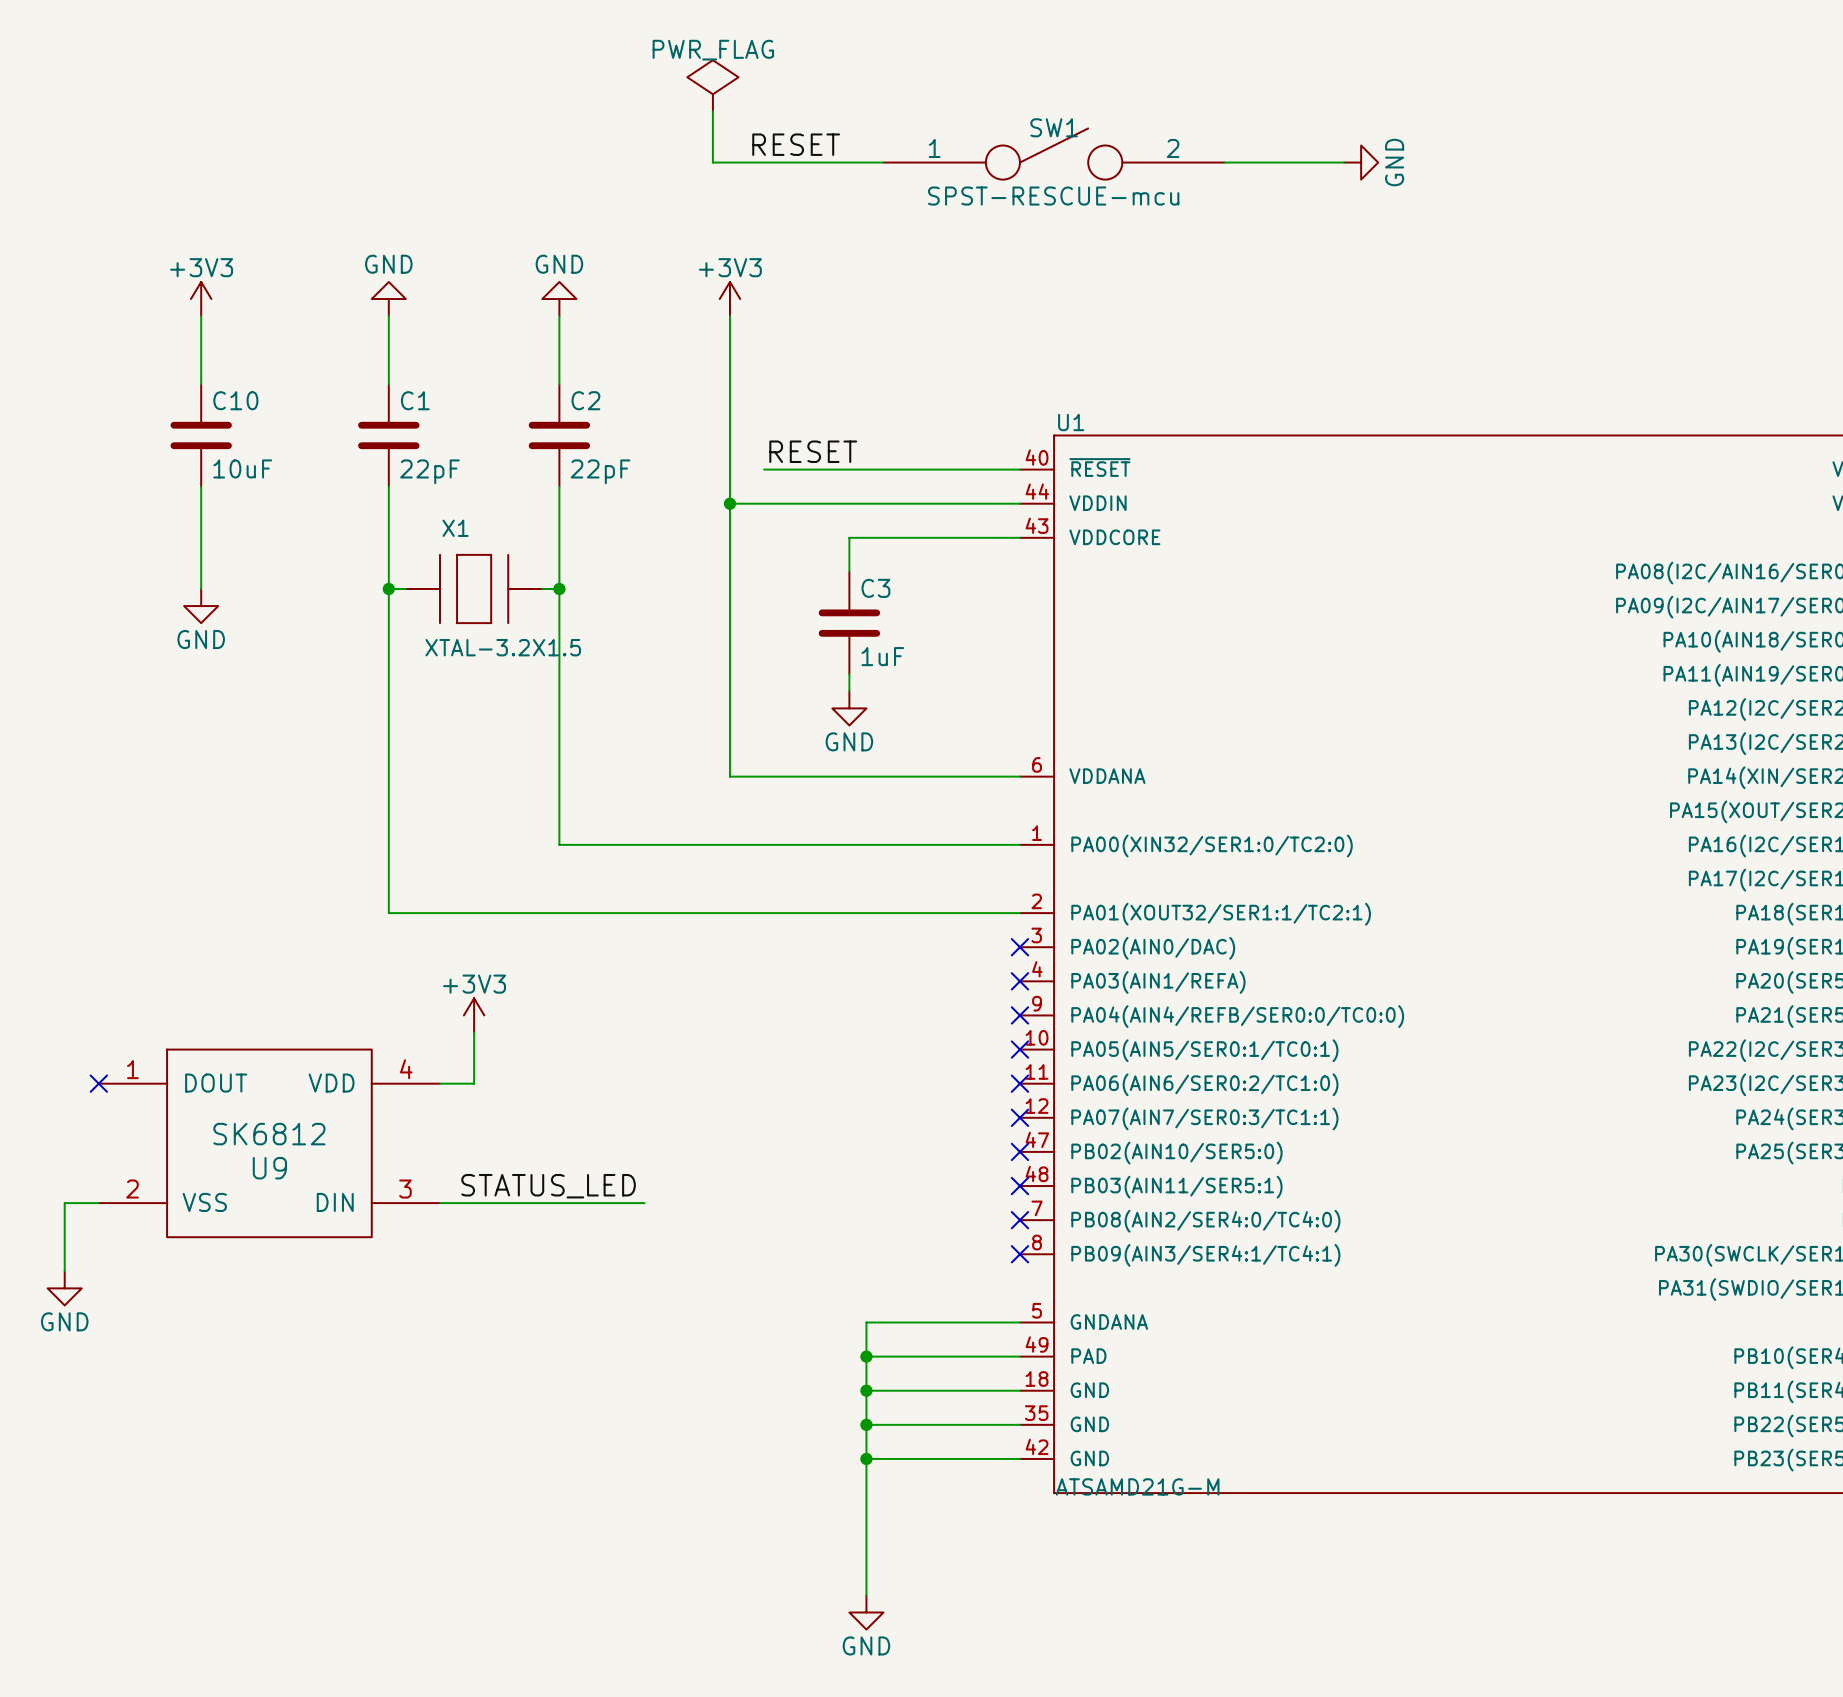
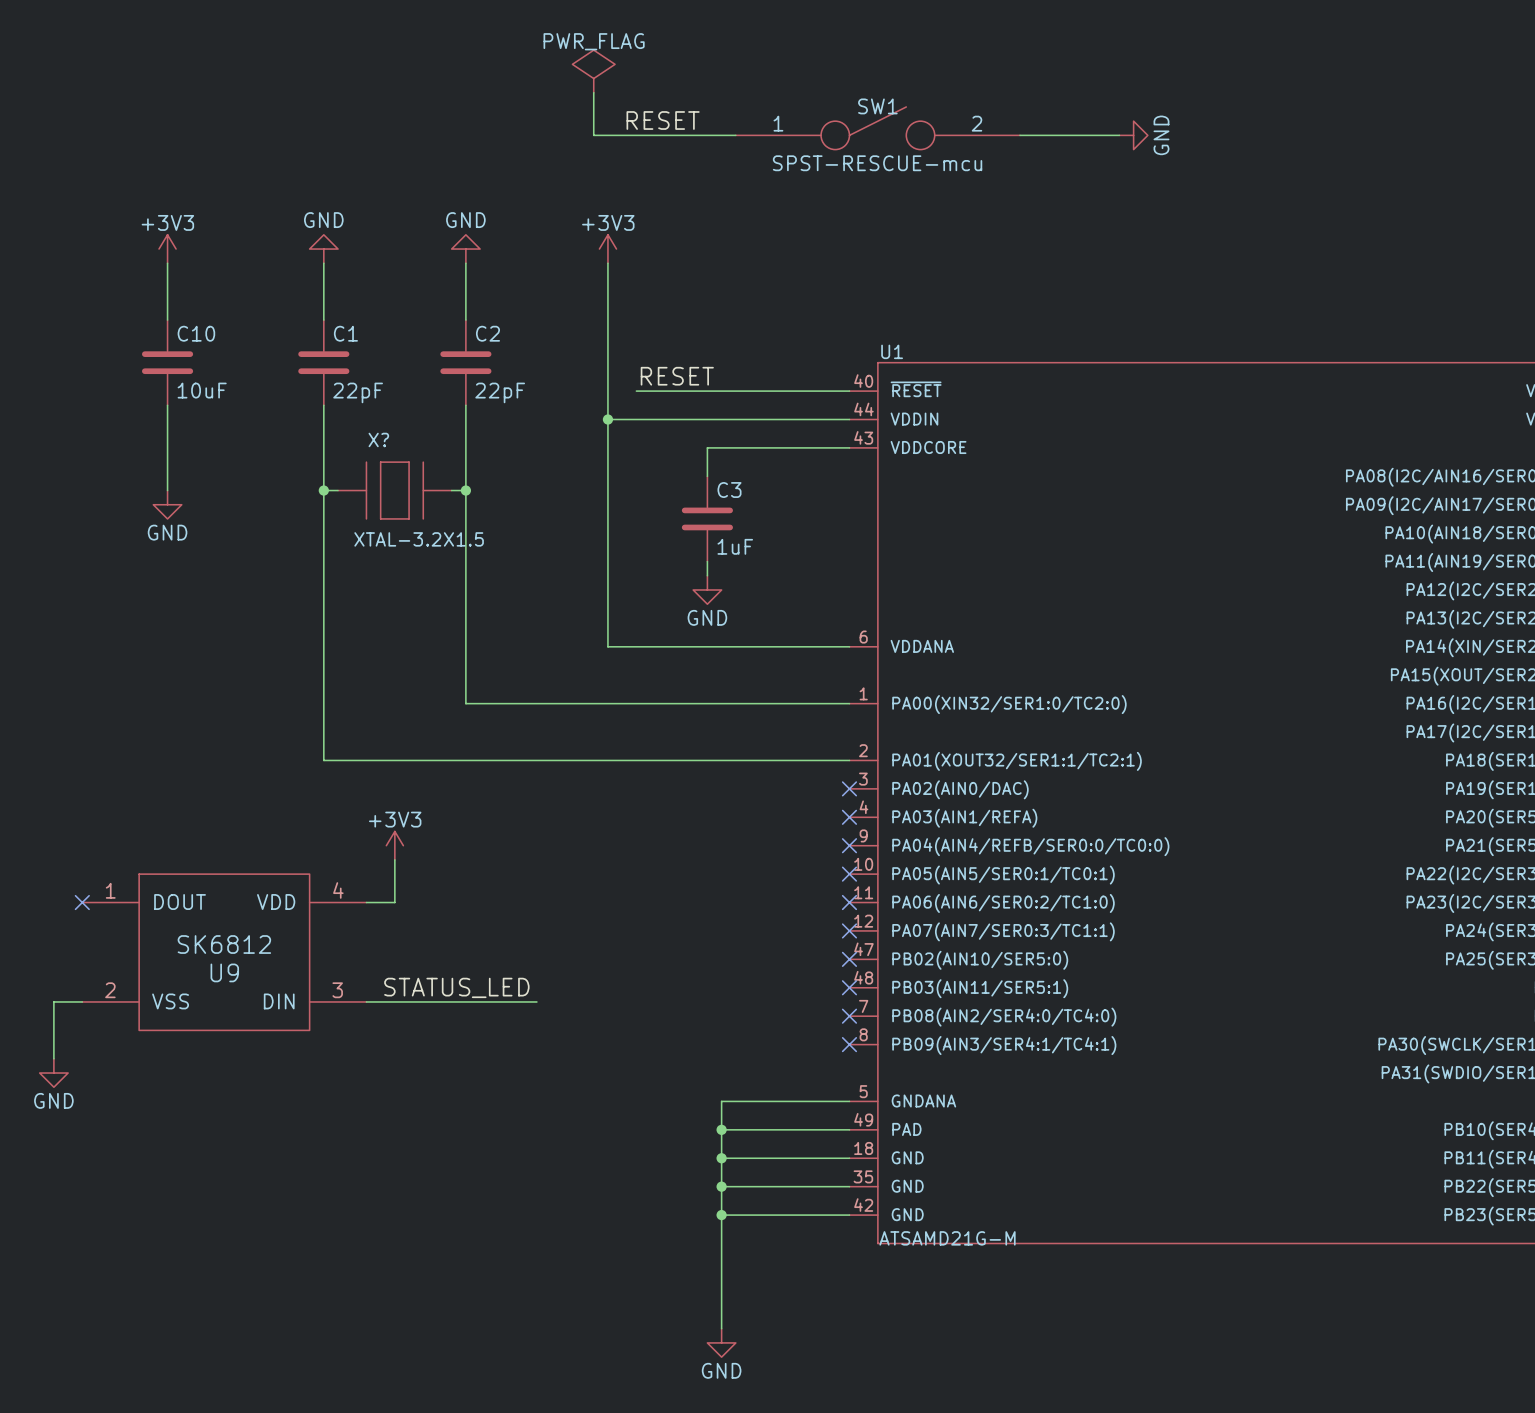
X1 name: X1 (455, 528) -> X? (378, 439)

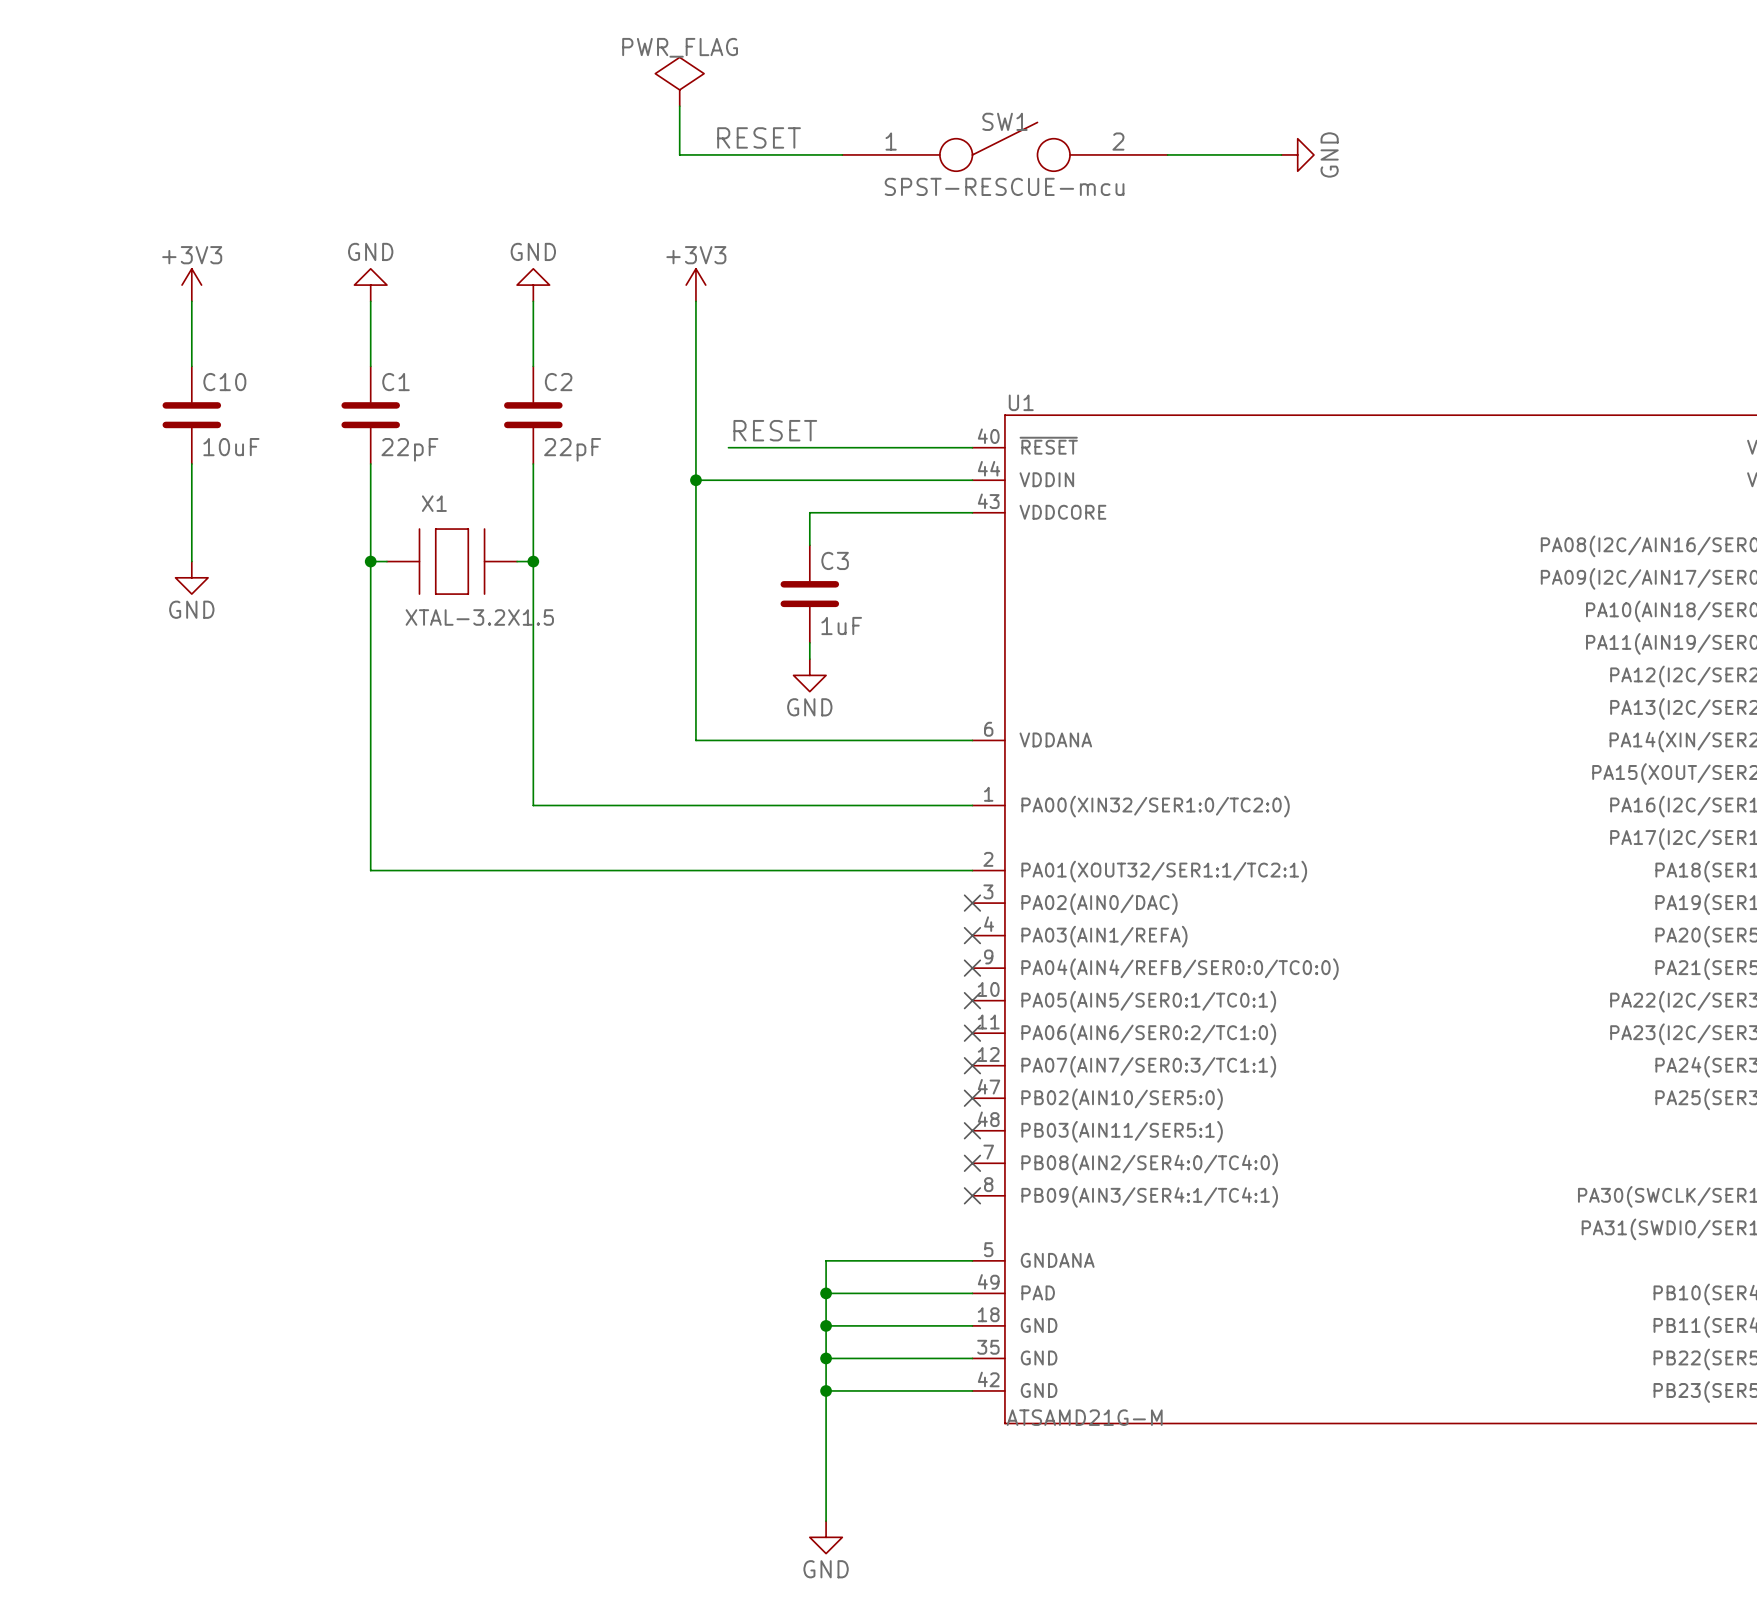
X? name: X? (378, 439) -> X1 (434, 503)
power symbol: +3V3 (394, 845) -> none
wire: (394, 859) (394, 902) (366, 902) -> none
no-connect mark: (82, 902) -> none
U9: SK6812 (224, 952) -> none
label: STATUS_LED (456, 987) -> none
wire: (82, 1001) (53, 1001) (53, 1058) -> none
wire: (366, 1001) (536, 1001) -> none
power symbol: GND (53, 1073) -> none

